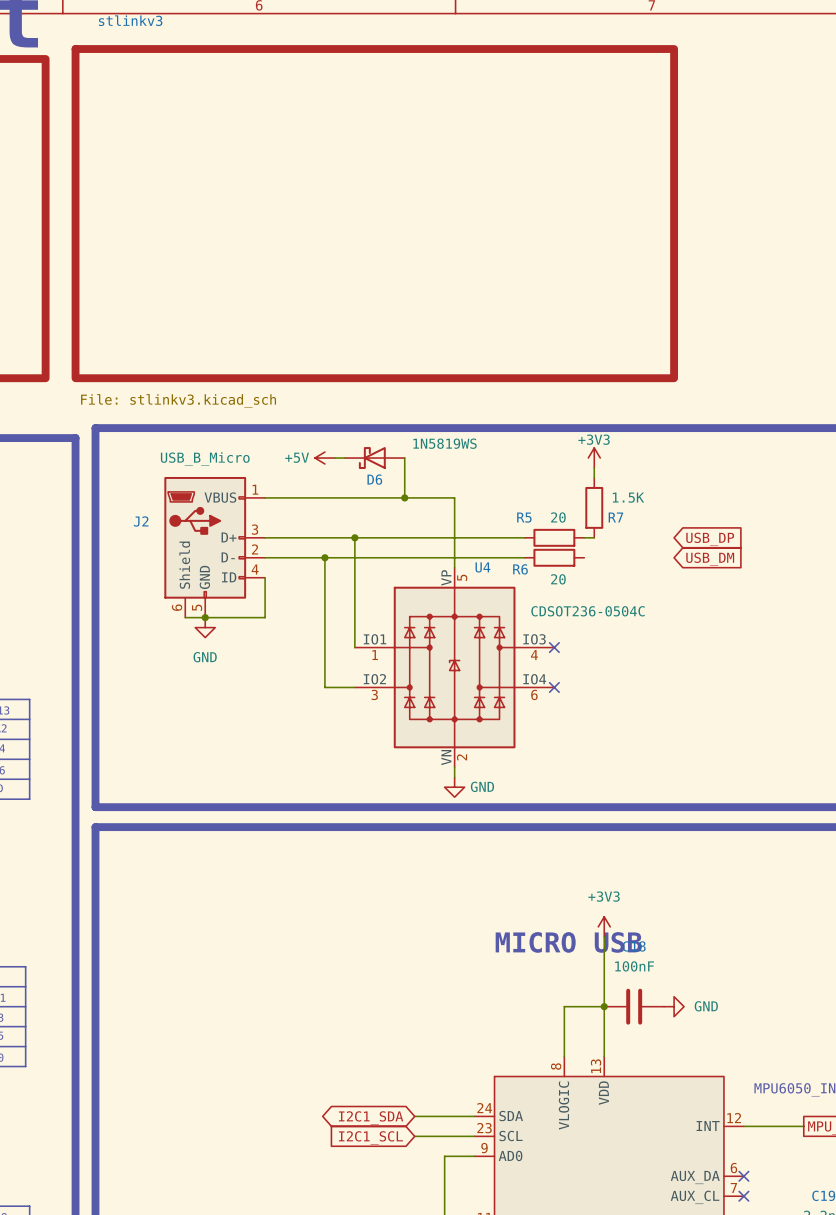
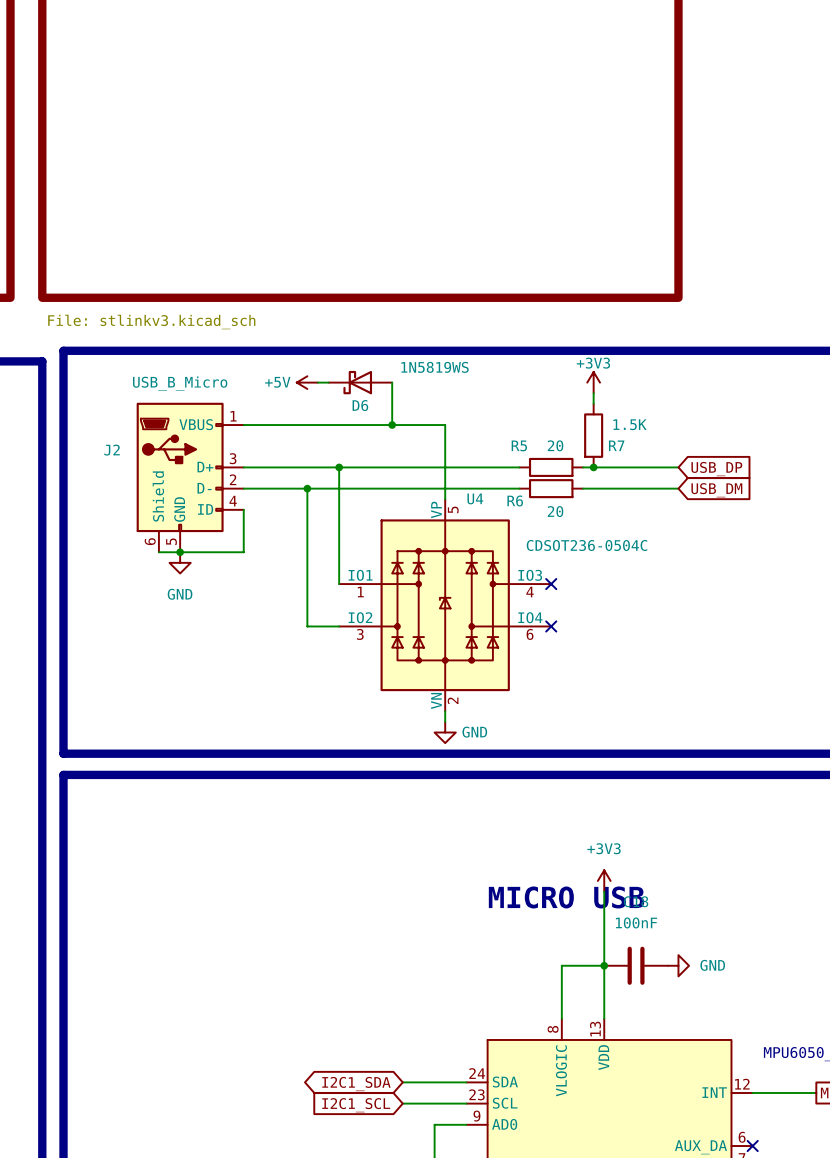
wire: none -> (593, 467) (678, 467)
junction: none -> (593, 467)
wire: none -> (583, 488) (678, 488)

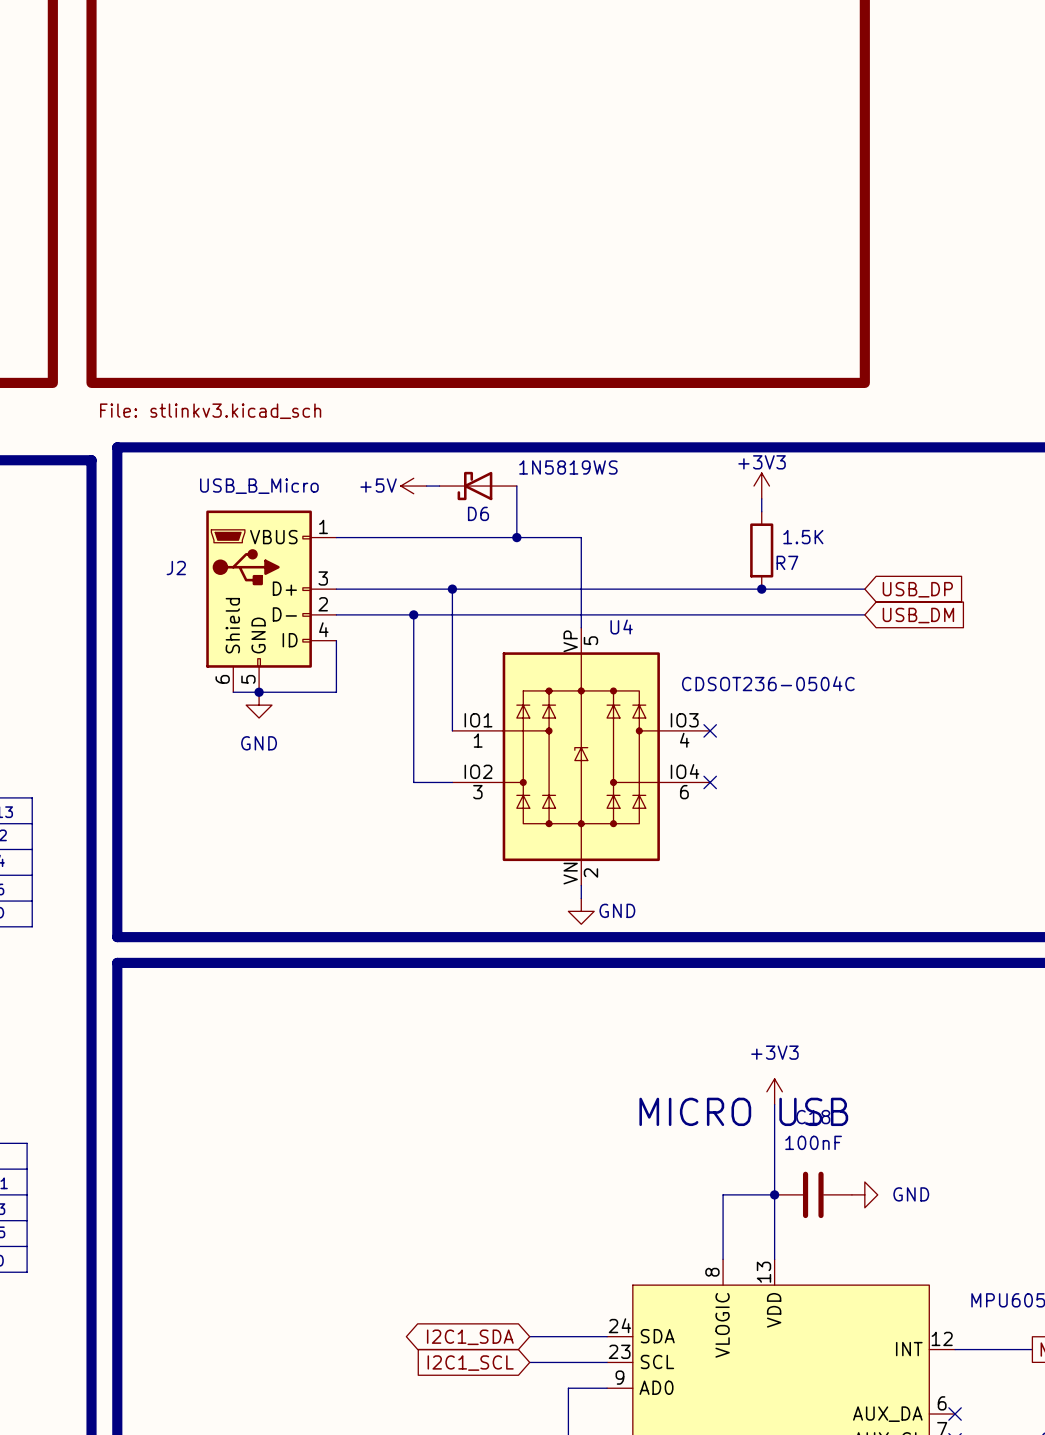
wire: none -> (671, 589) (748, 589)
R5: 20 (551, 467) -> none
wire: none -> (671, 614) (748, 614)
R6: 20 (551, 488) -> none

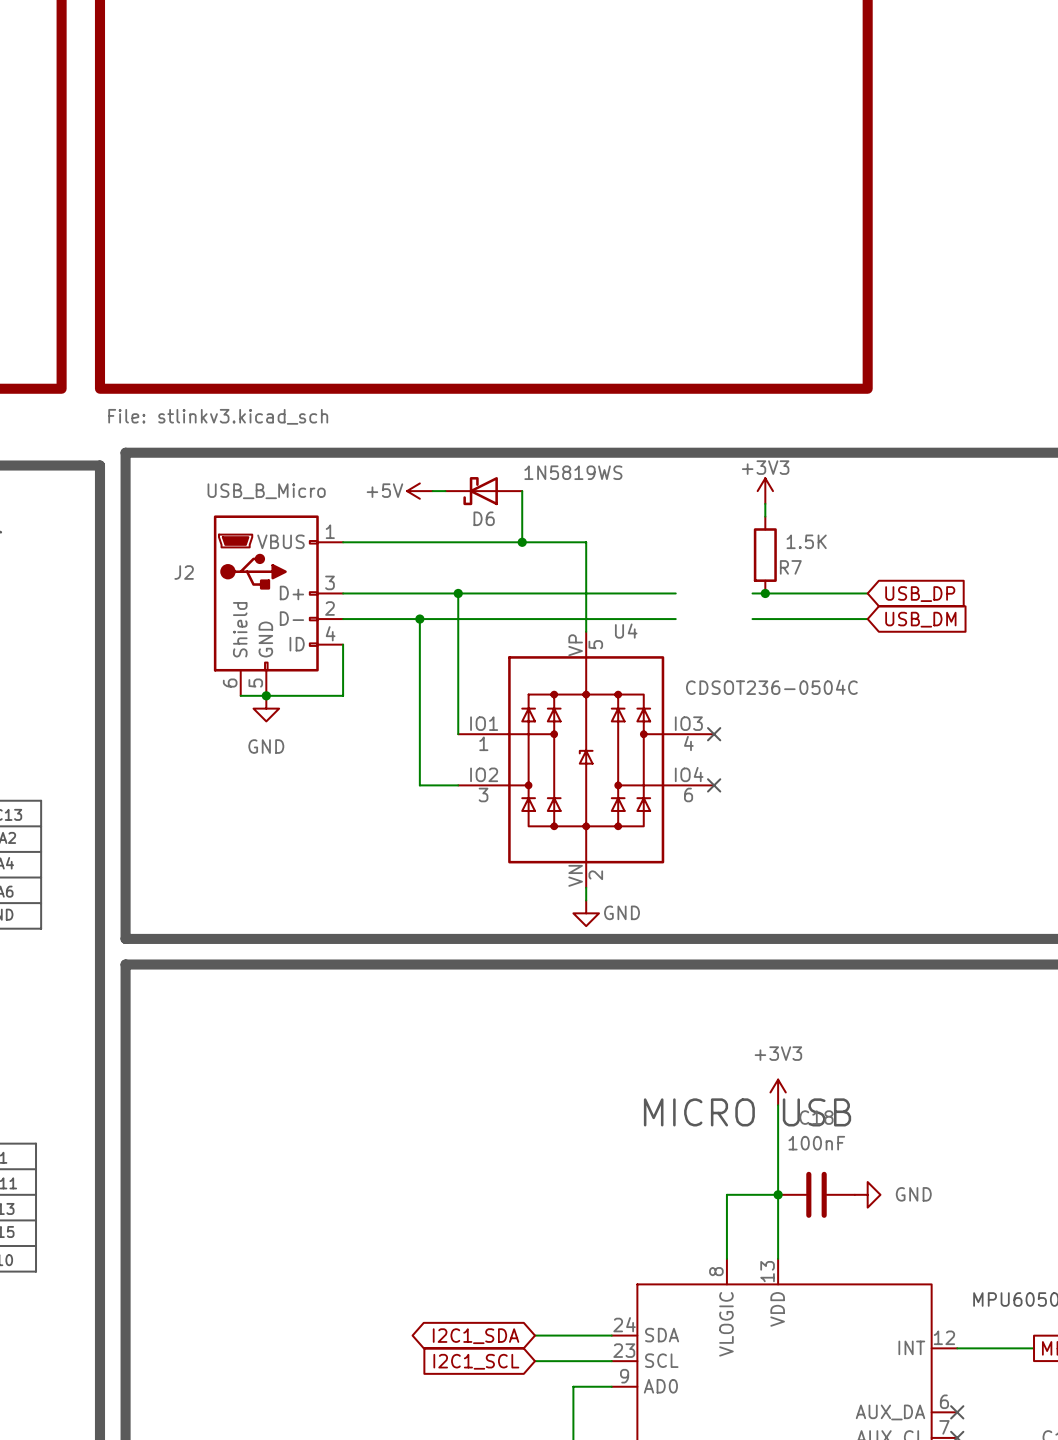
wire: (671, 589) (748, 589) -> none
wire: (671, 614) (748, 614) -> none

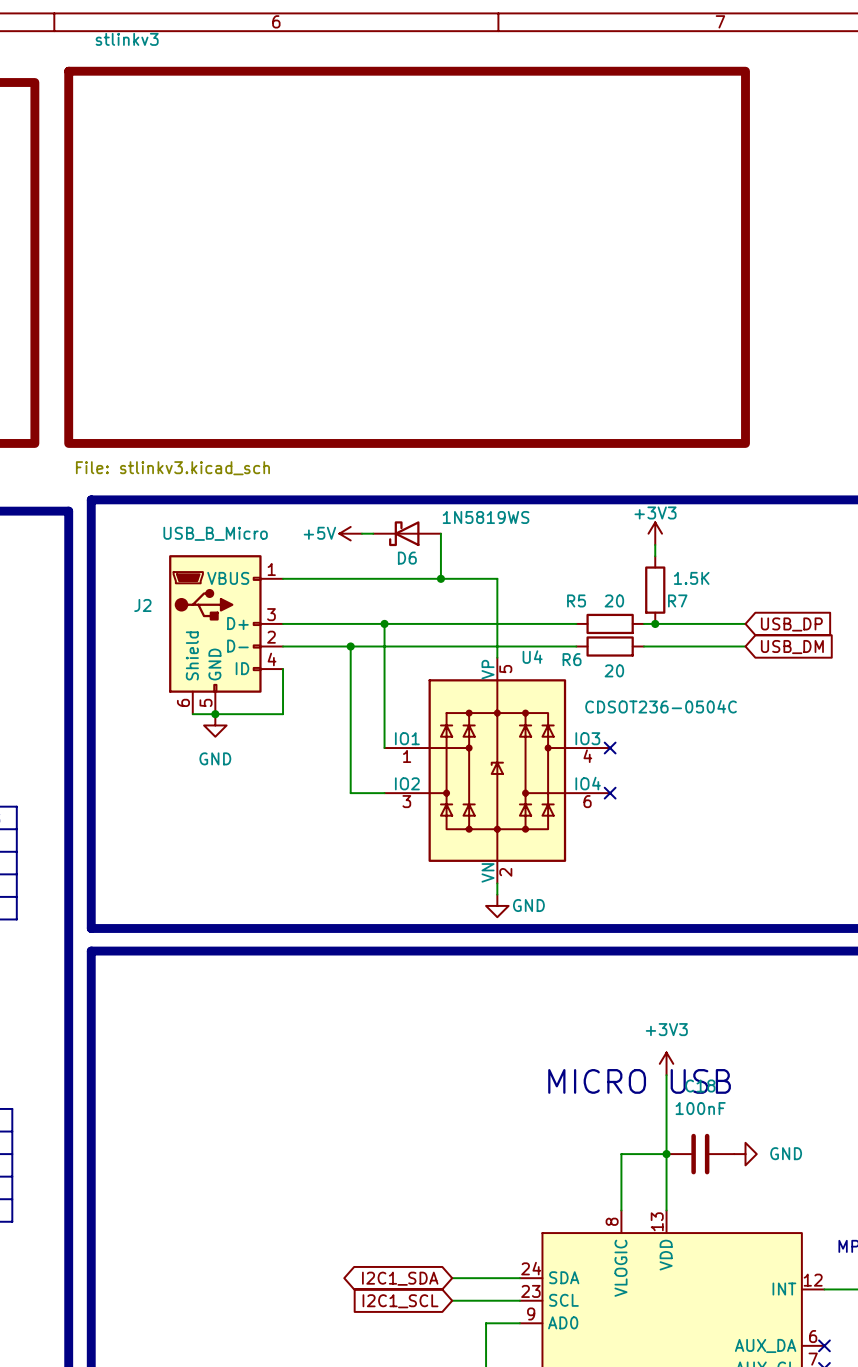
R5: none -> 20 (610, 623)
R6: none -> 20 (610, 646)

